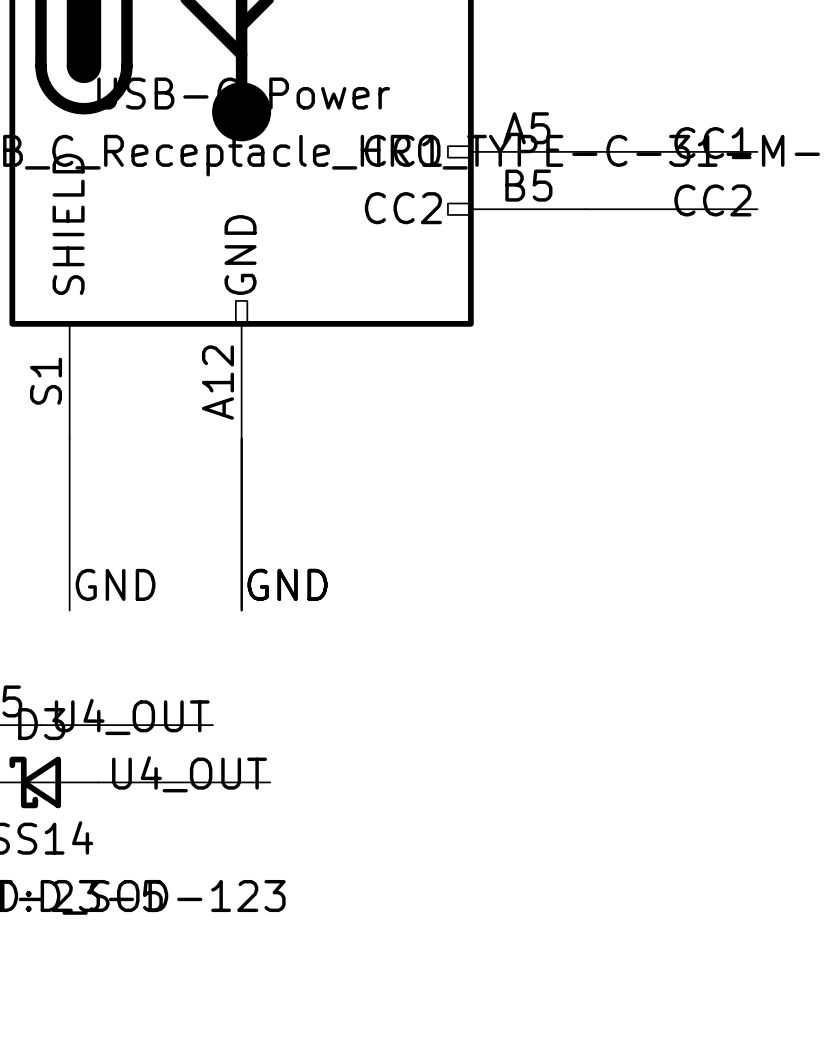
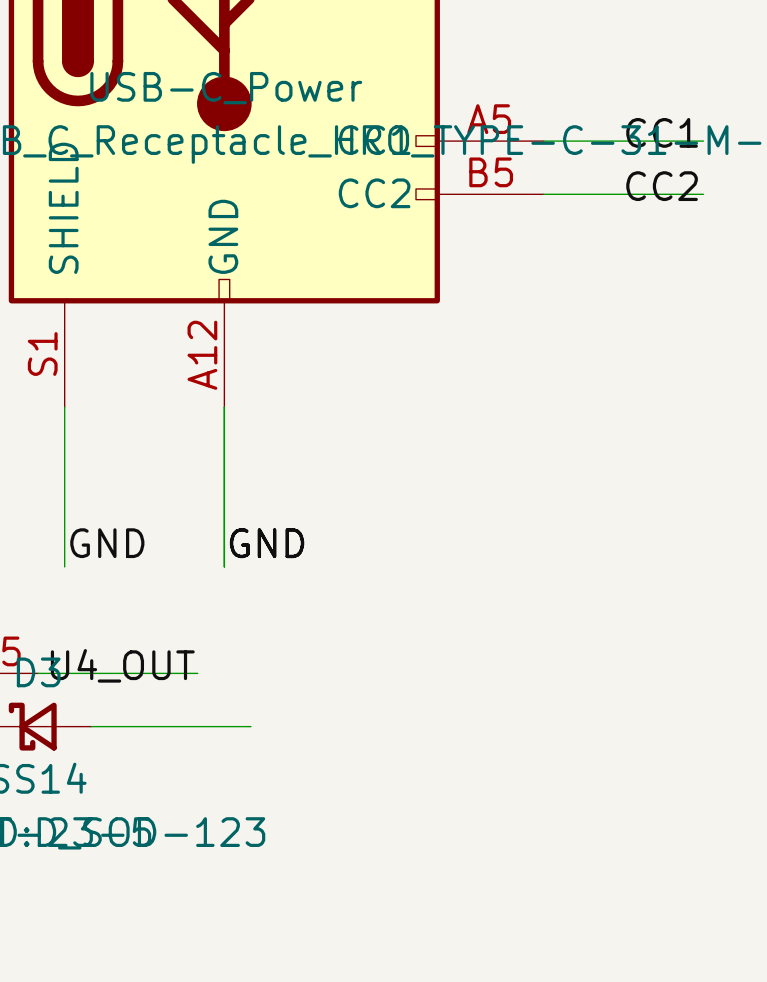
label: U4_OUT (189, 774) -> none

